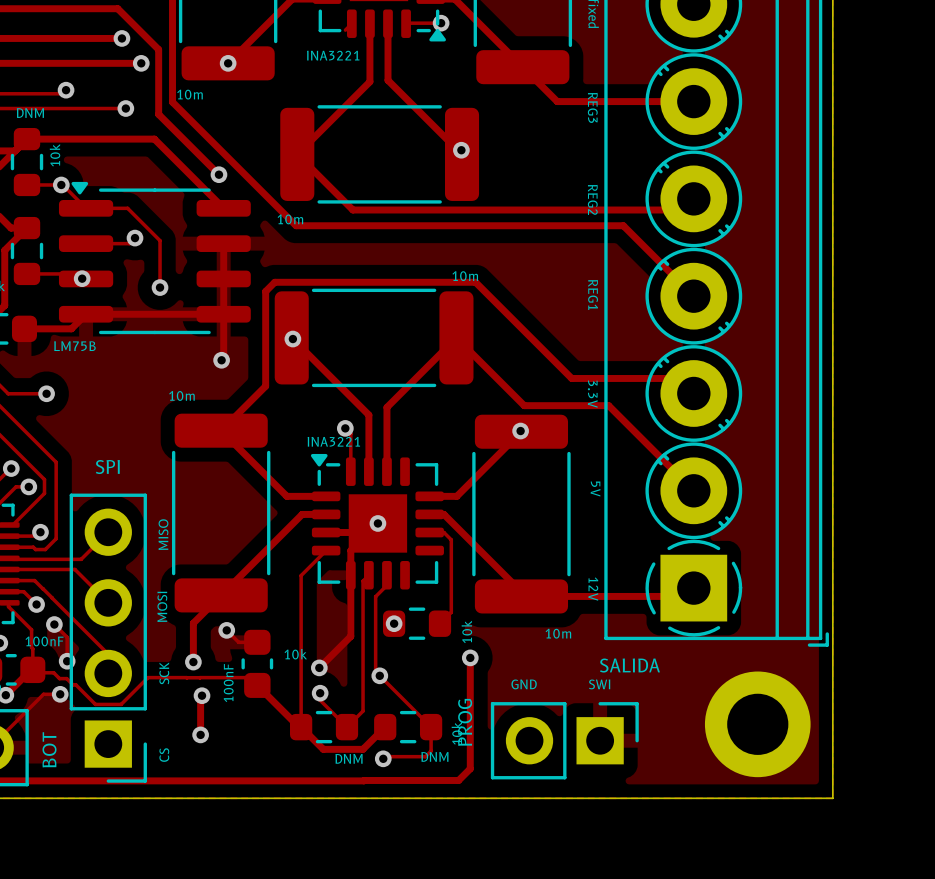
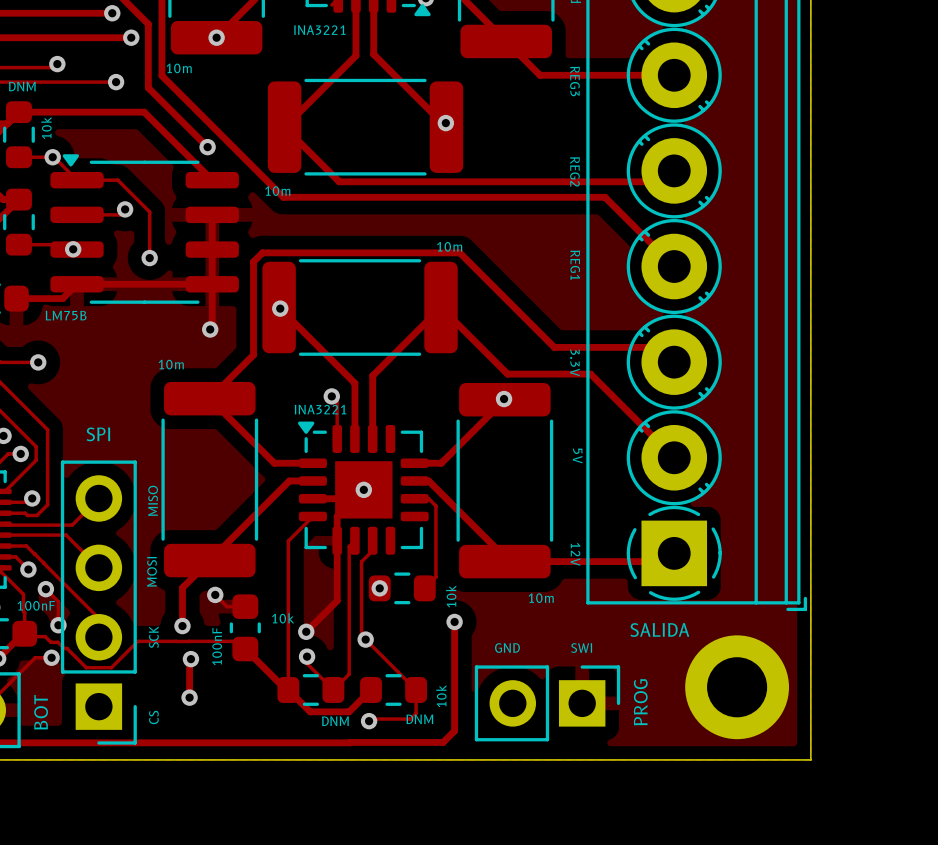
part value position: SALIDA (629, 665) -> SALIDA (659, 630)
part value position: PROG (465, 722) -> PROG (640, 702)

